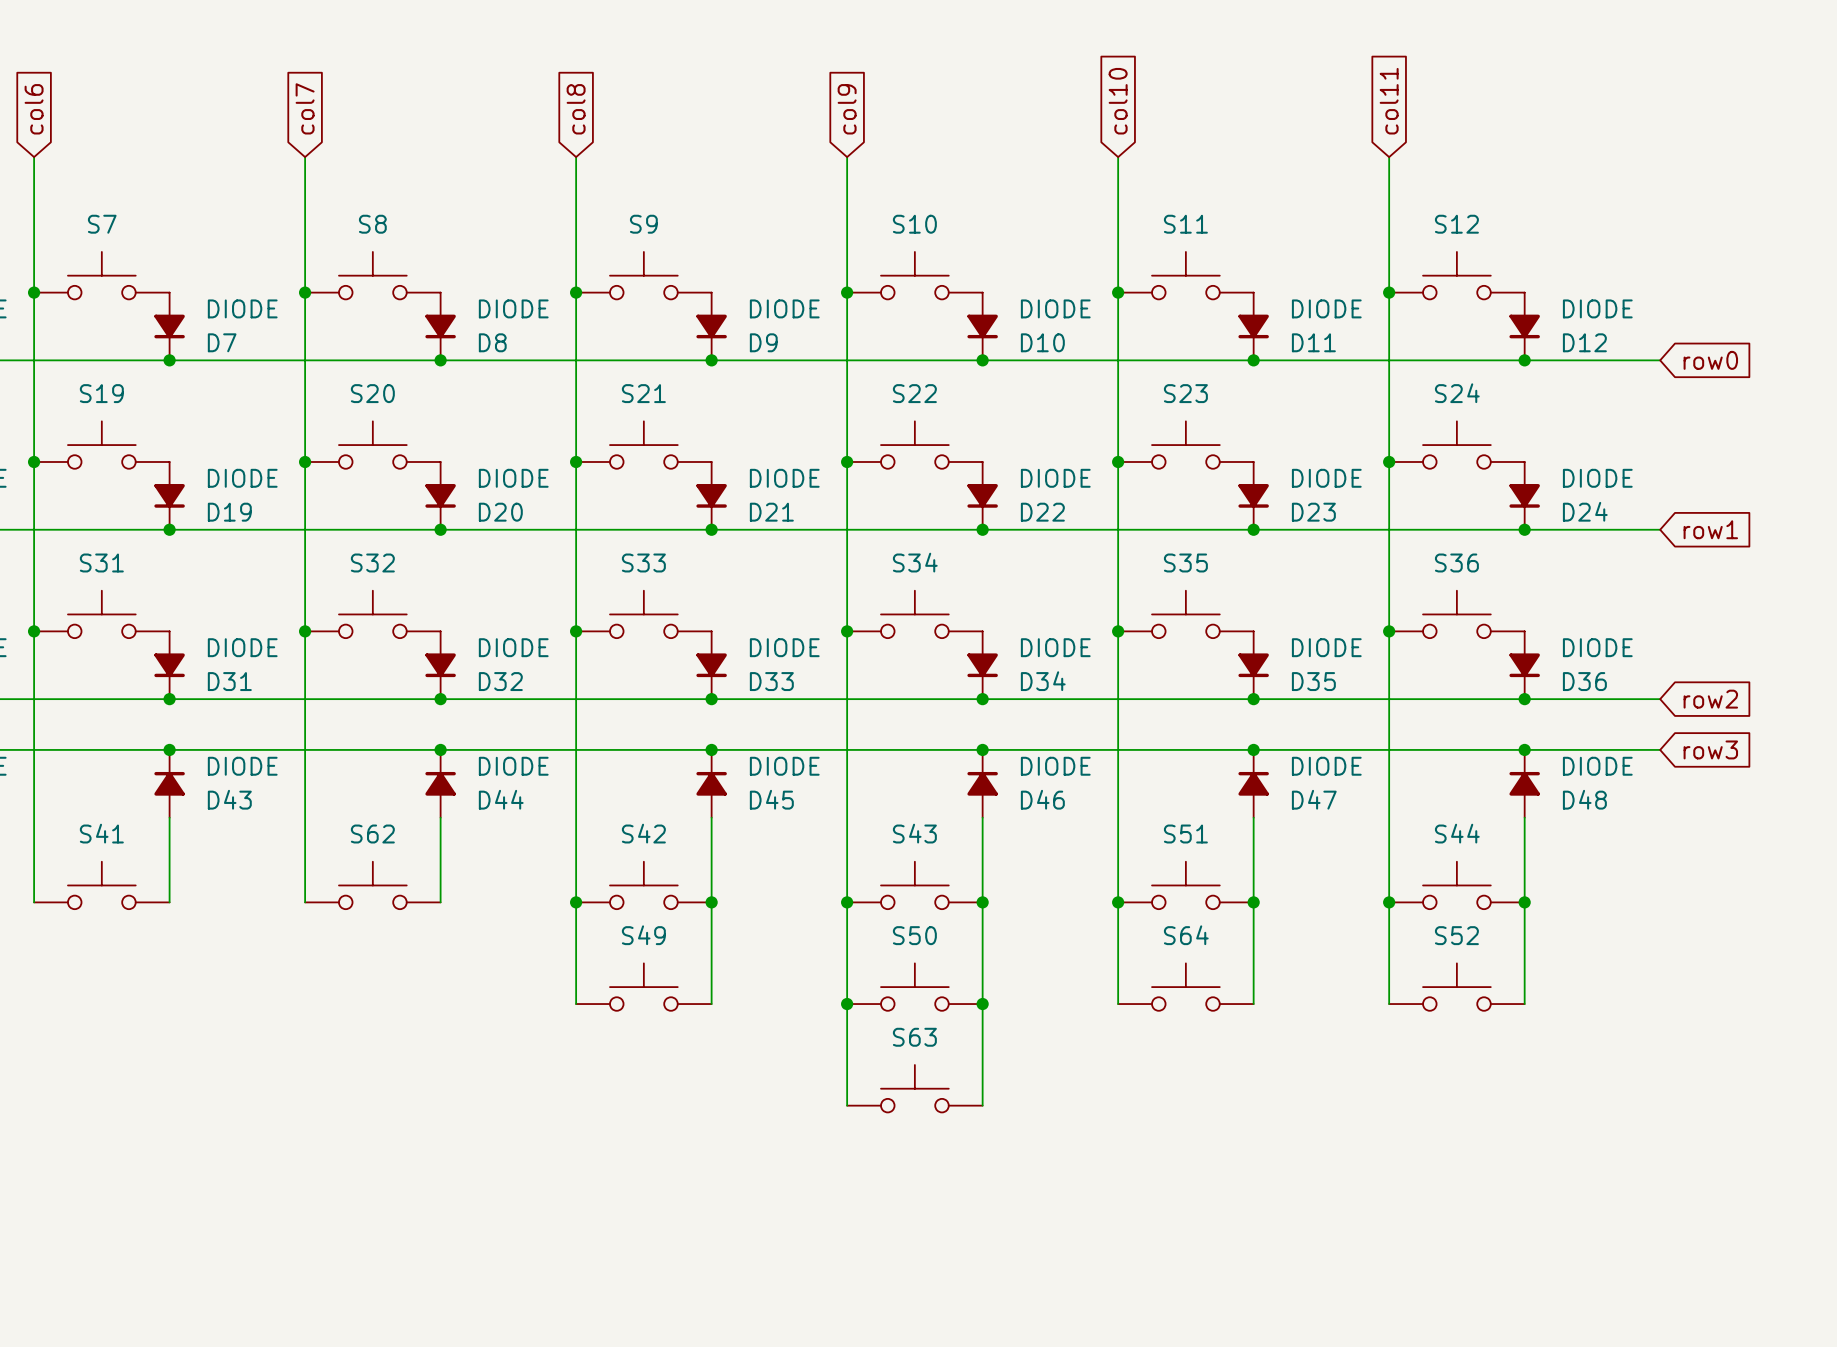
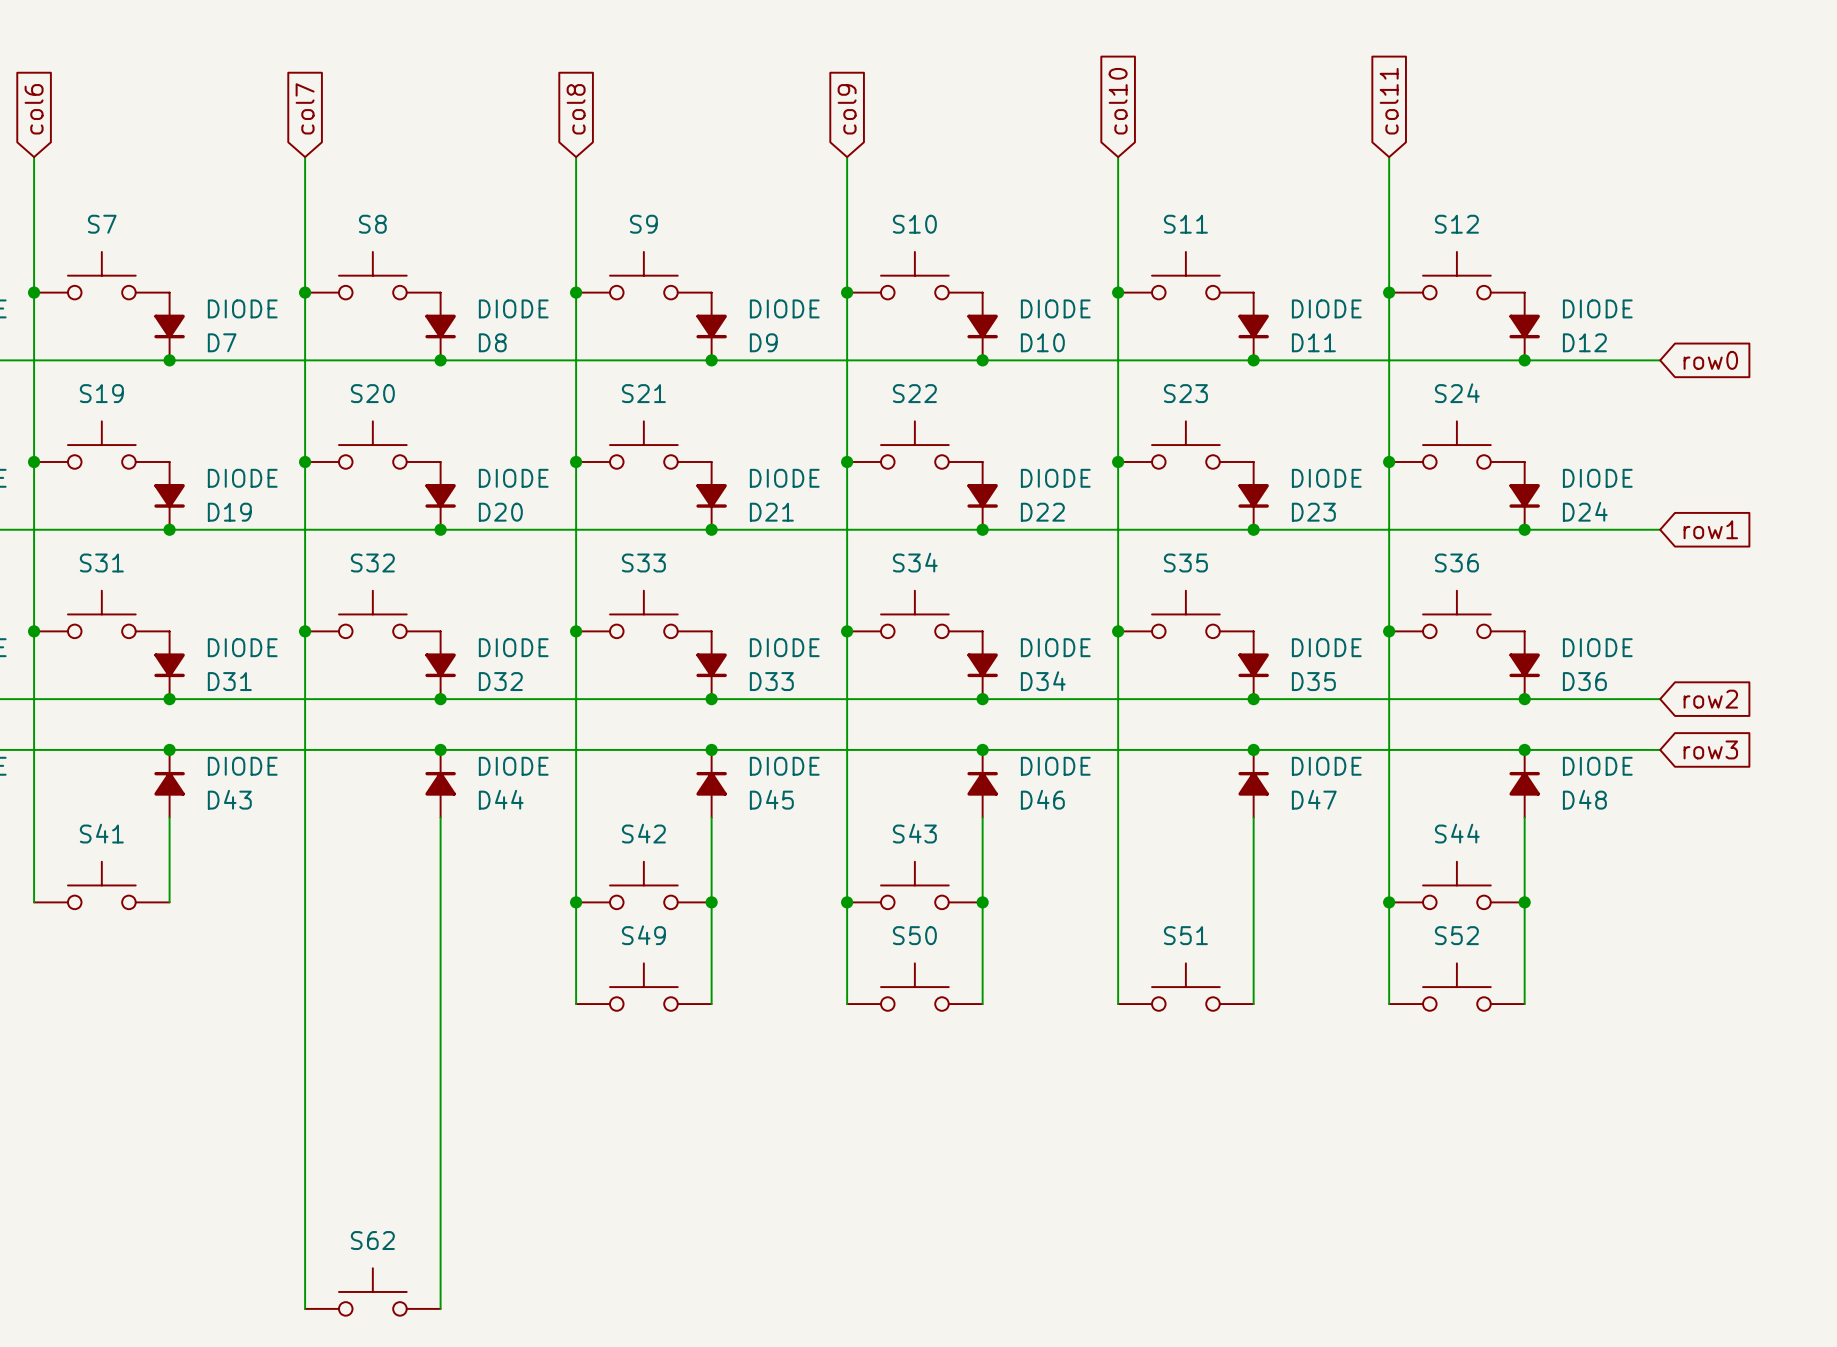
S62 position: (372, 885) -> (372, 1291)
S51: (1185, 885) -> none
wire: none -> (305, 902) (305, 1308)
wire: none -> (440, 902) (440, 1308)
junction: (1118, 902) -> none
junction: (1253, 902) -> none
S64 name: S64 (1186, 935) -> S51 (1185, 935)
wire: (847, 1004) (847, 1105) -> none
junction: (847, 1004) -> none
wire: (982, 1004) (982, 1105) -> none
junction: (982, 1004) -> none
S63: (914, 1088) -> none

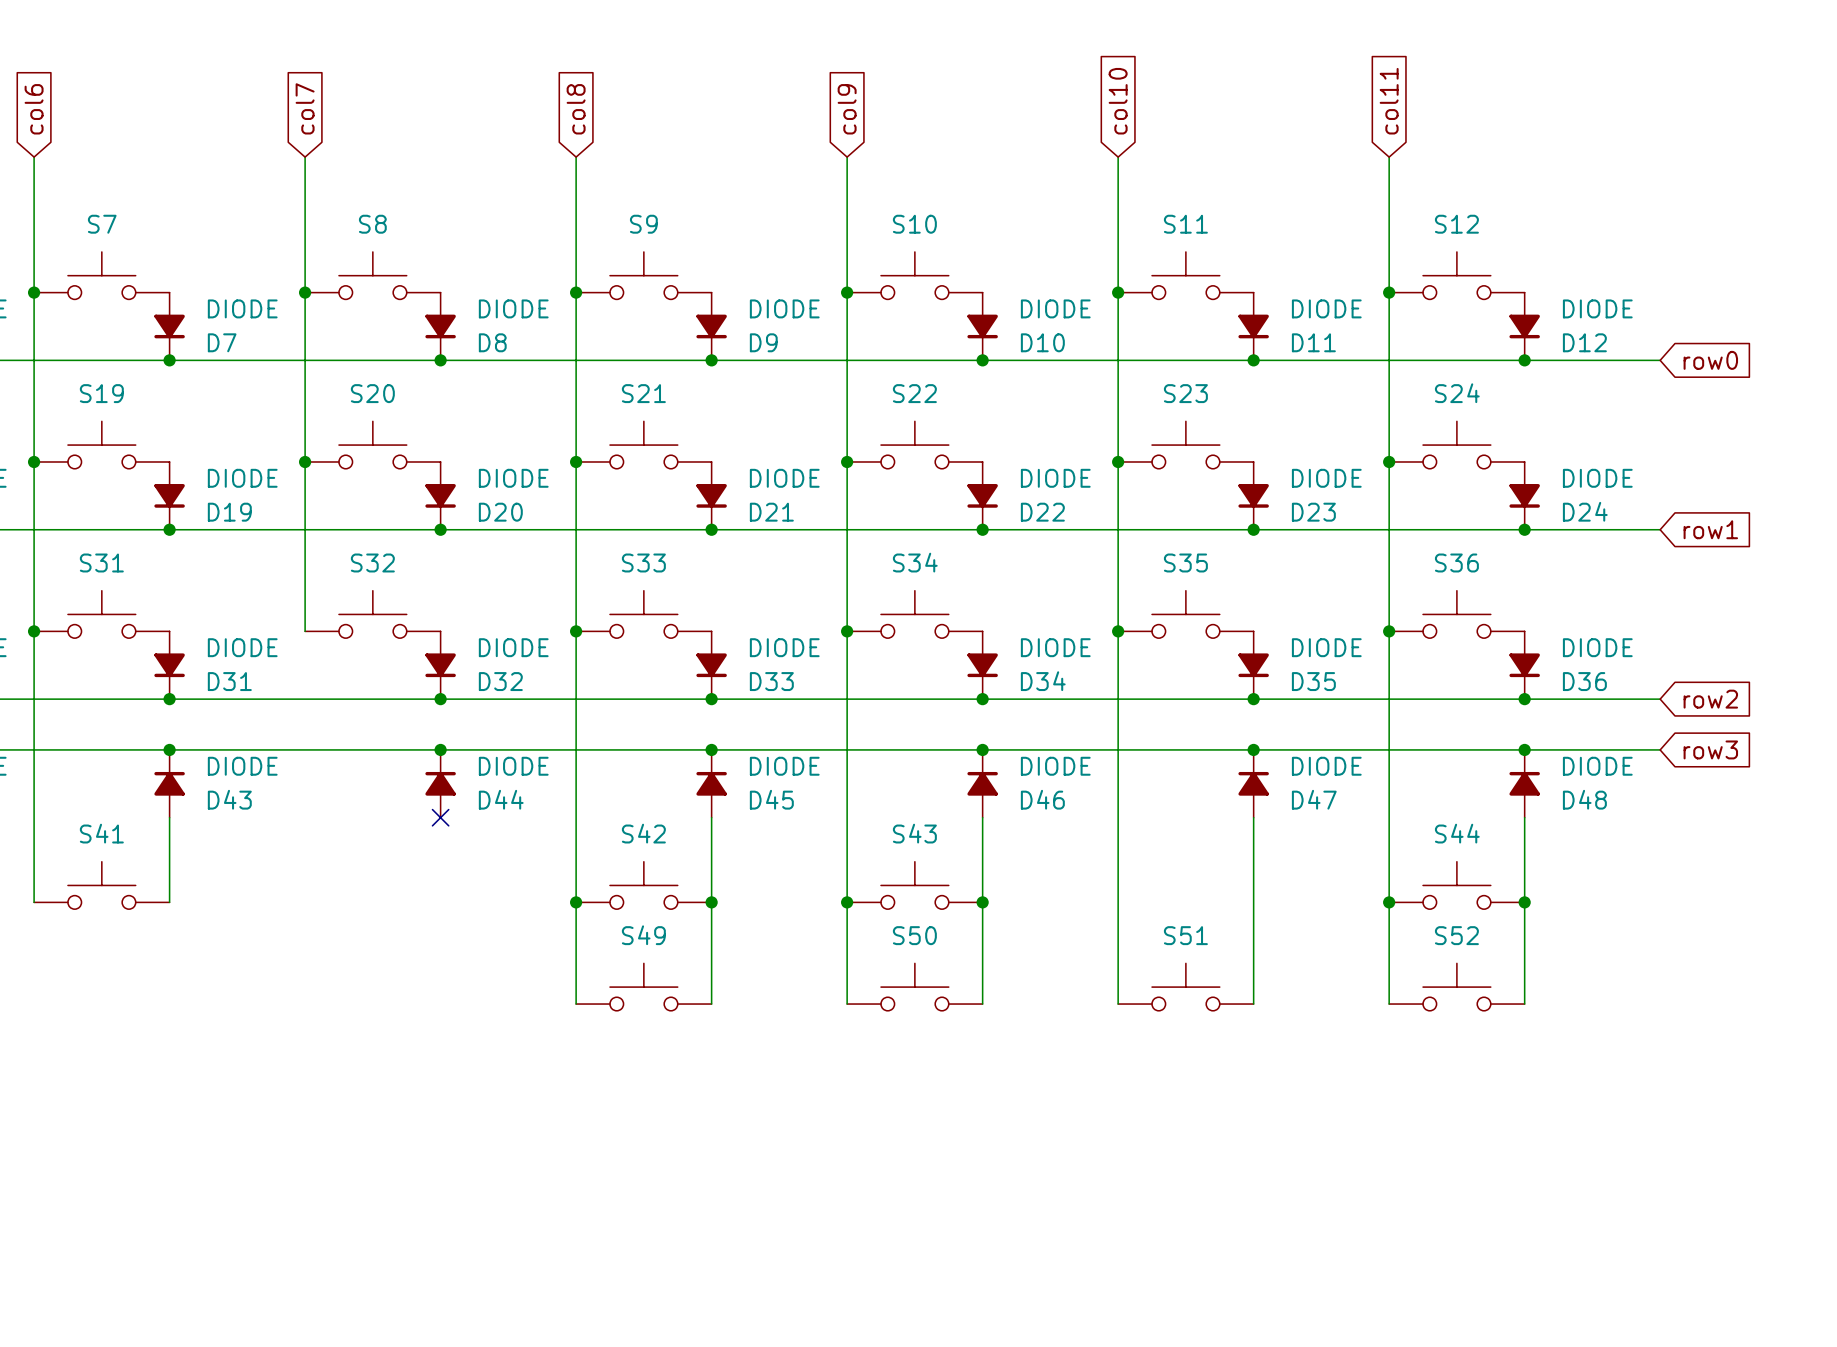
wire: (305, 631) (305, 1308) -> none
junction: (305, 631) -> none
wire: (440, 817) (440, 1308) -> none
no-connect mark: none -> (440, 817)
S62: (372, 1291) -> none

